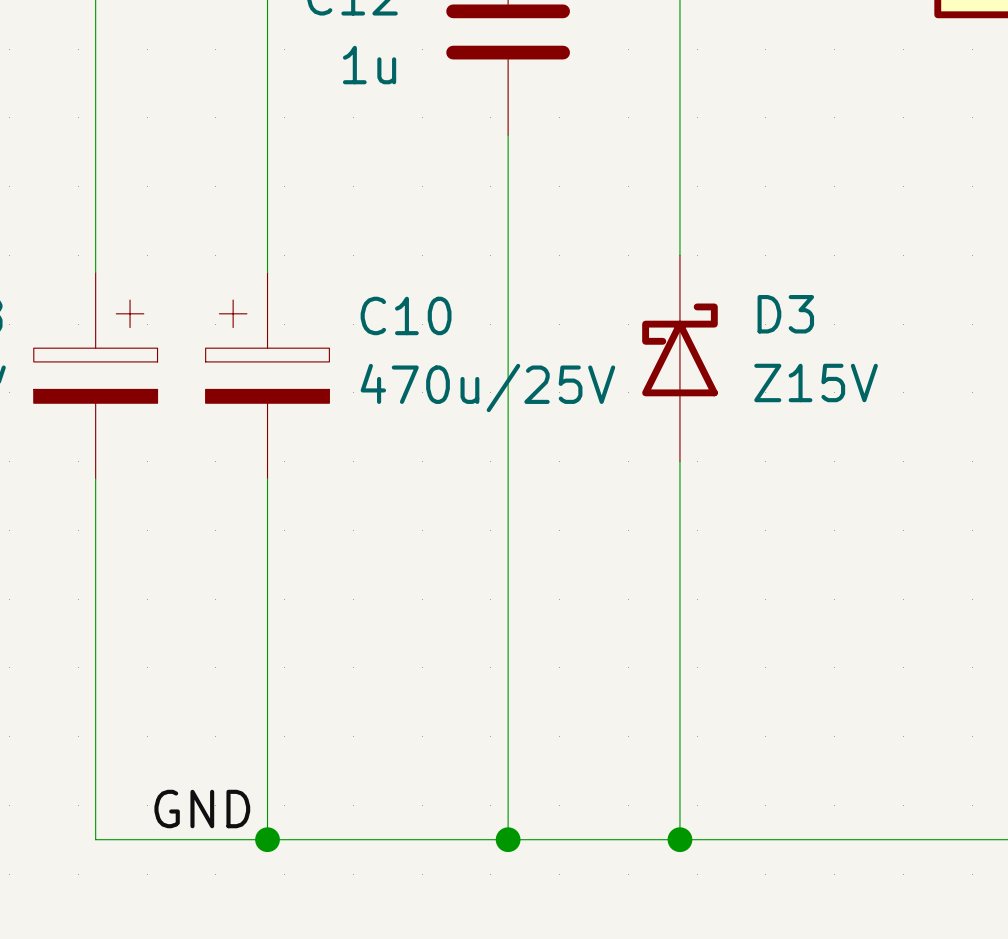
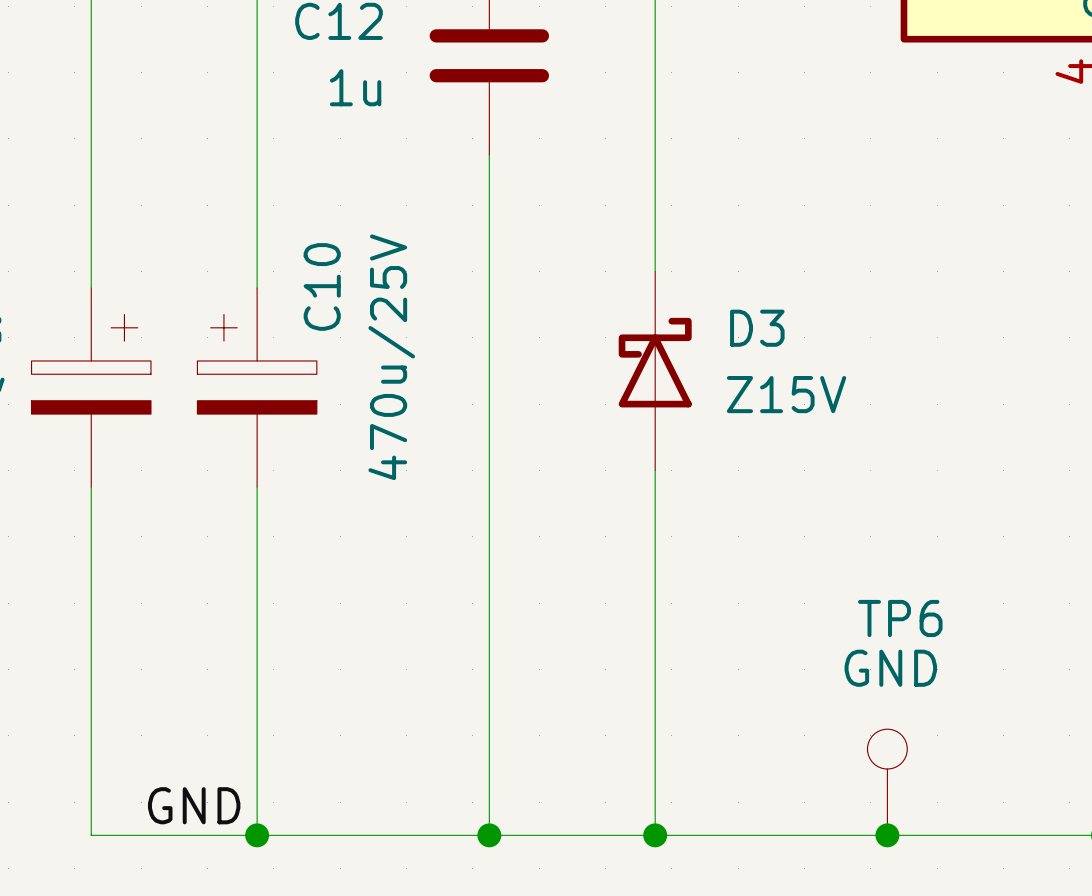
C10 name rotation: 0° (406, 315) -> 90° counterclockwise (322, 286)
C10 value rotation: 0° (487, 387) -> 90° counterclockwise (391, 357)
TP6: none -> GND (887, 782)
junction: none -> (887, 835)

